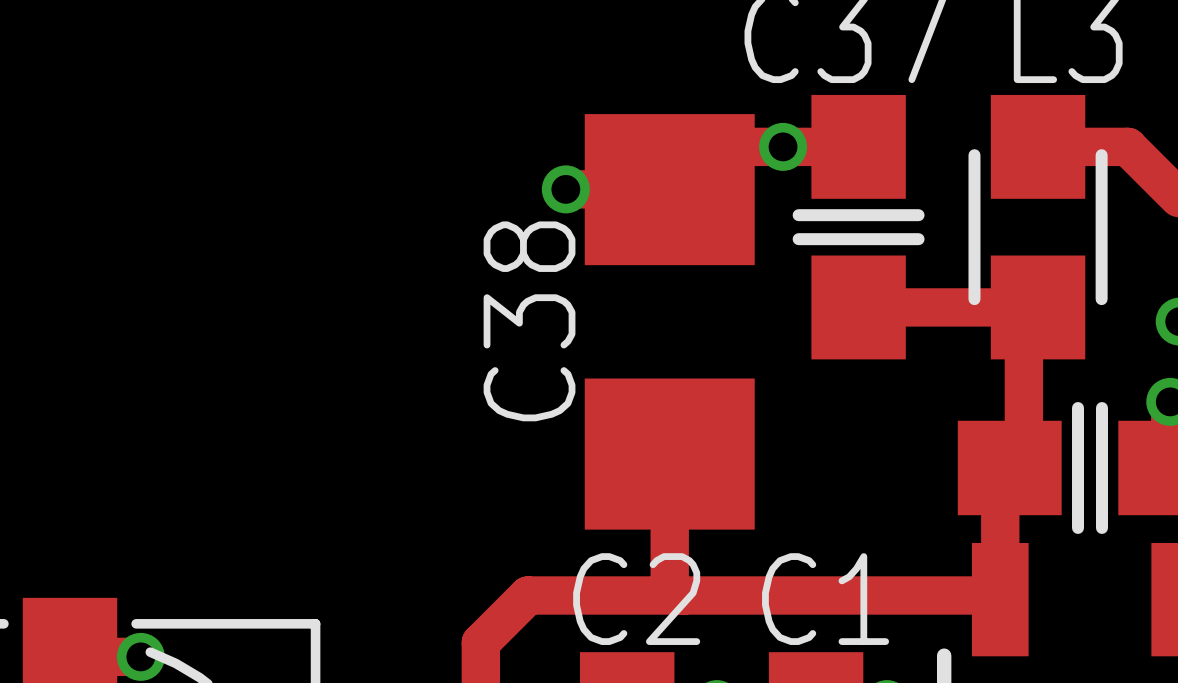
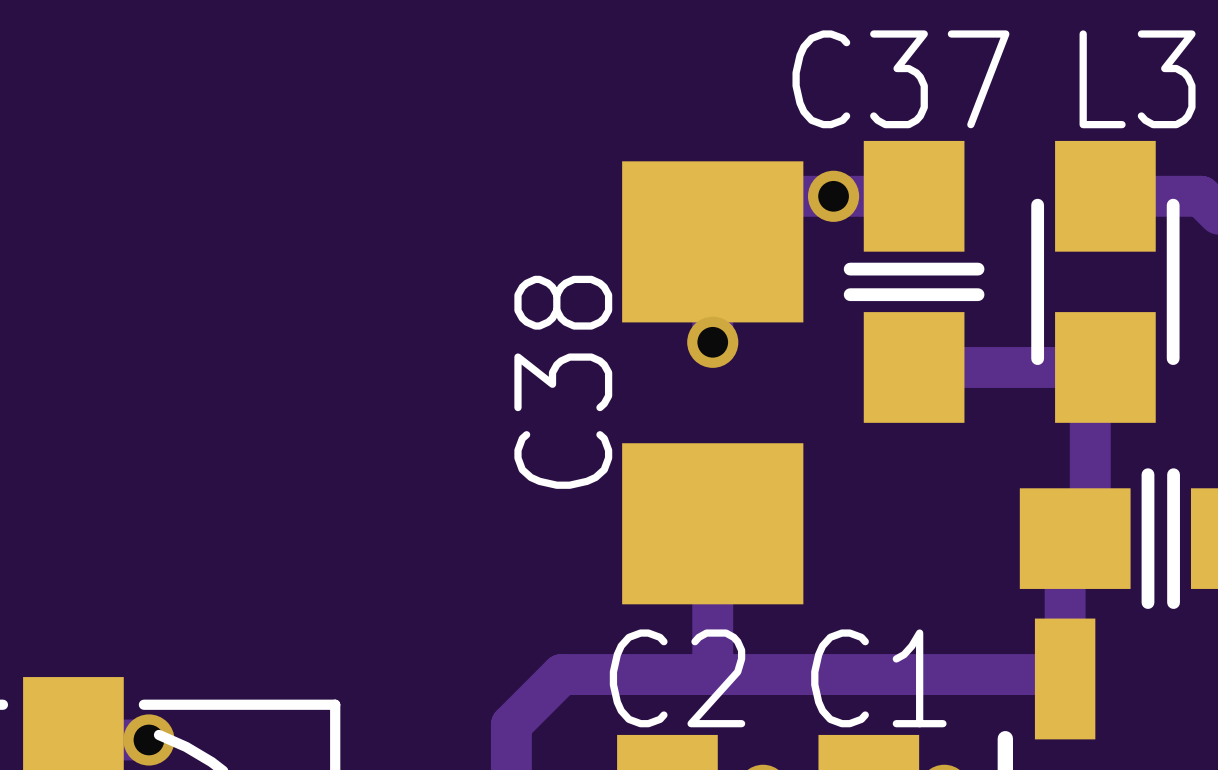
via position: (565, 189) -> (712, 342)

